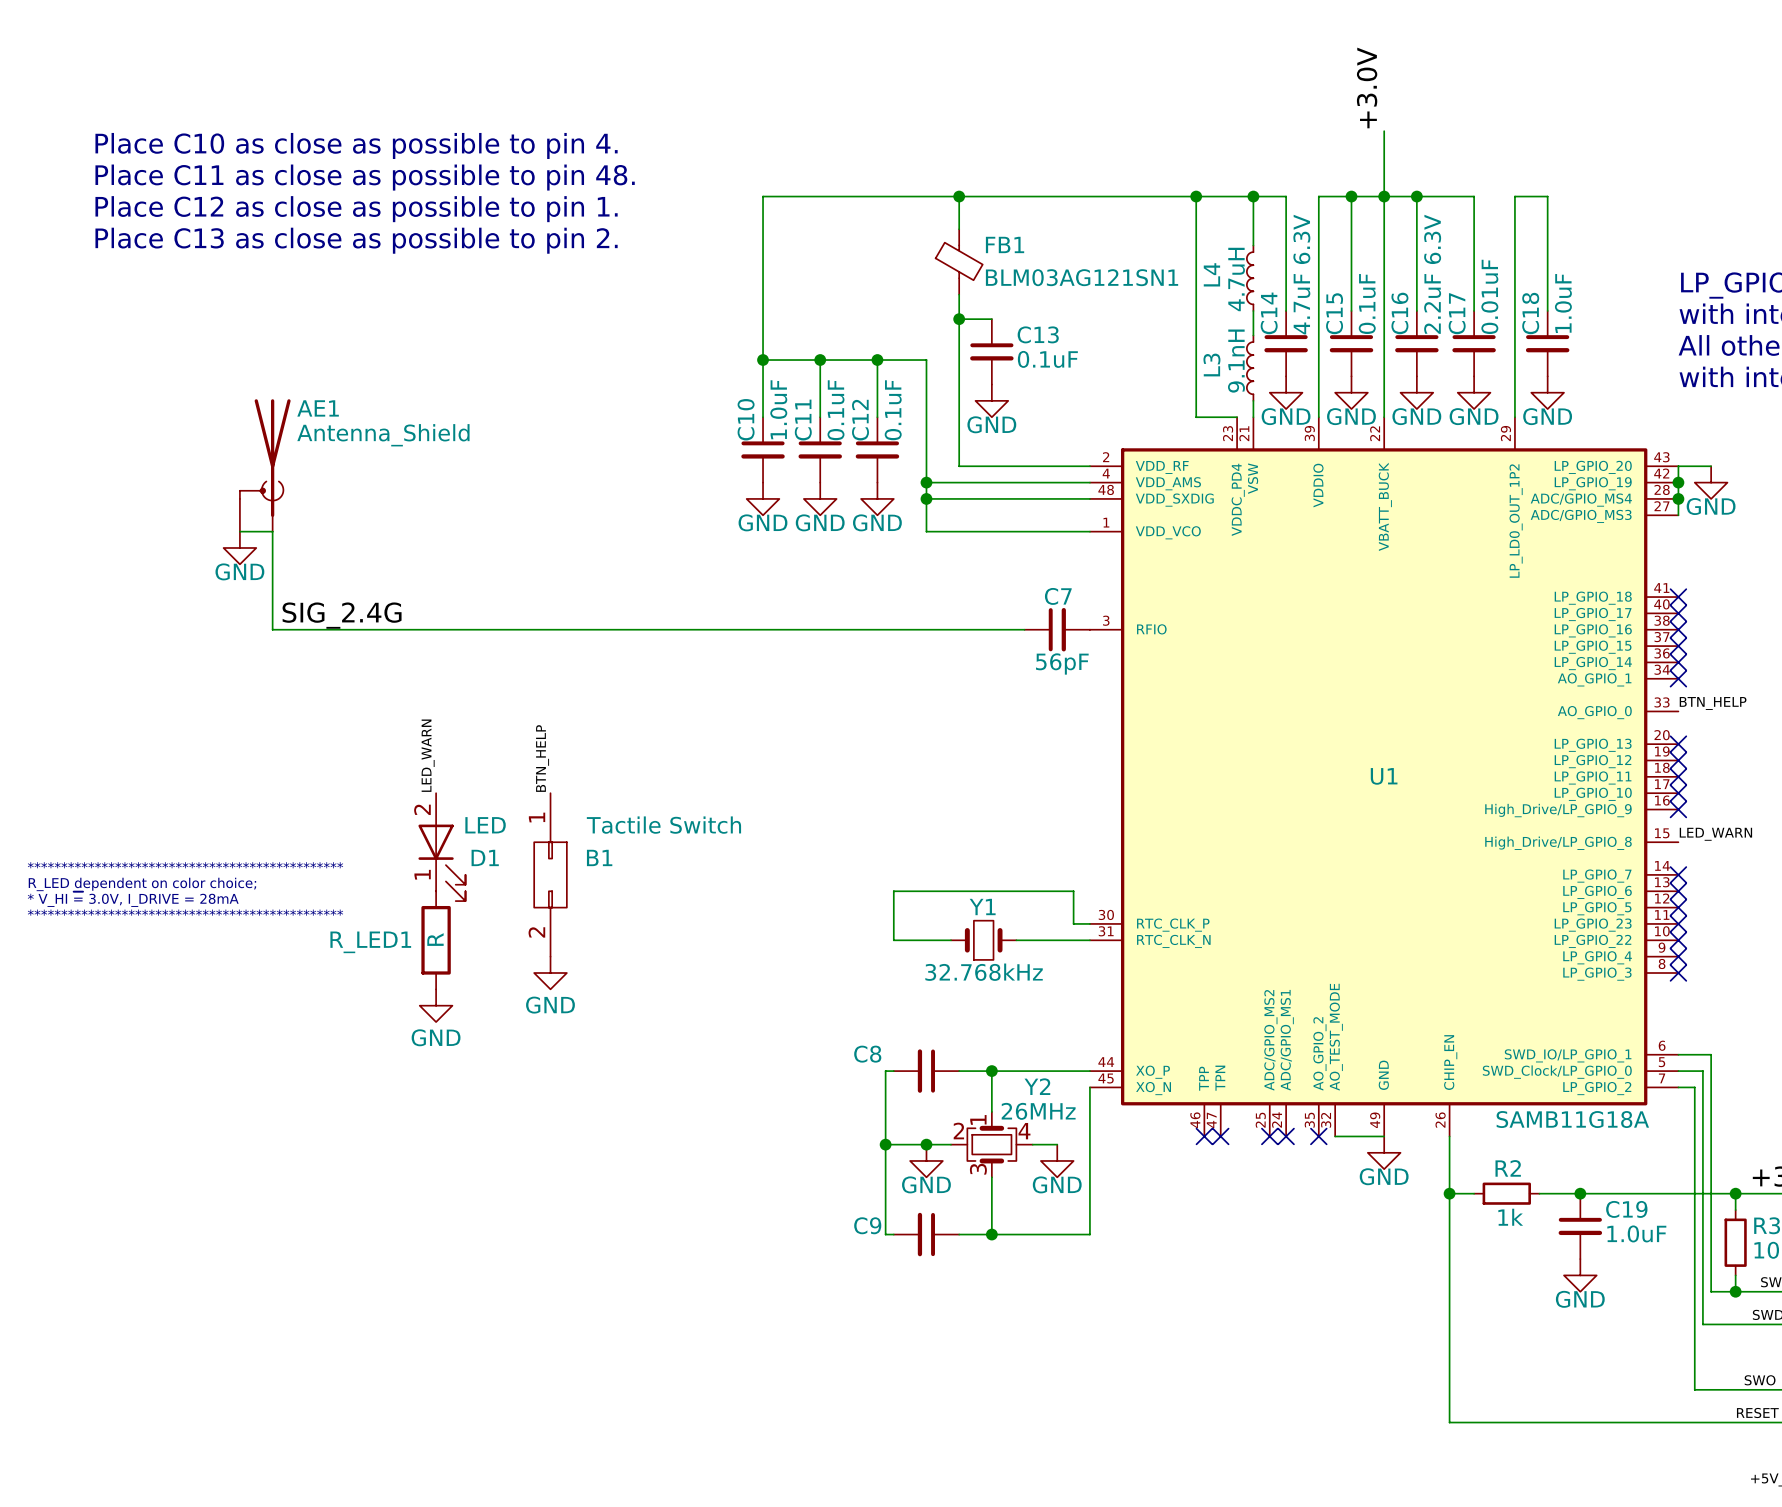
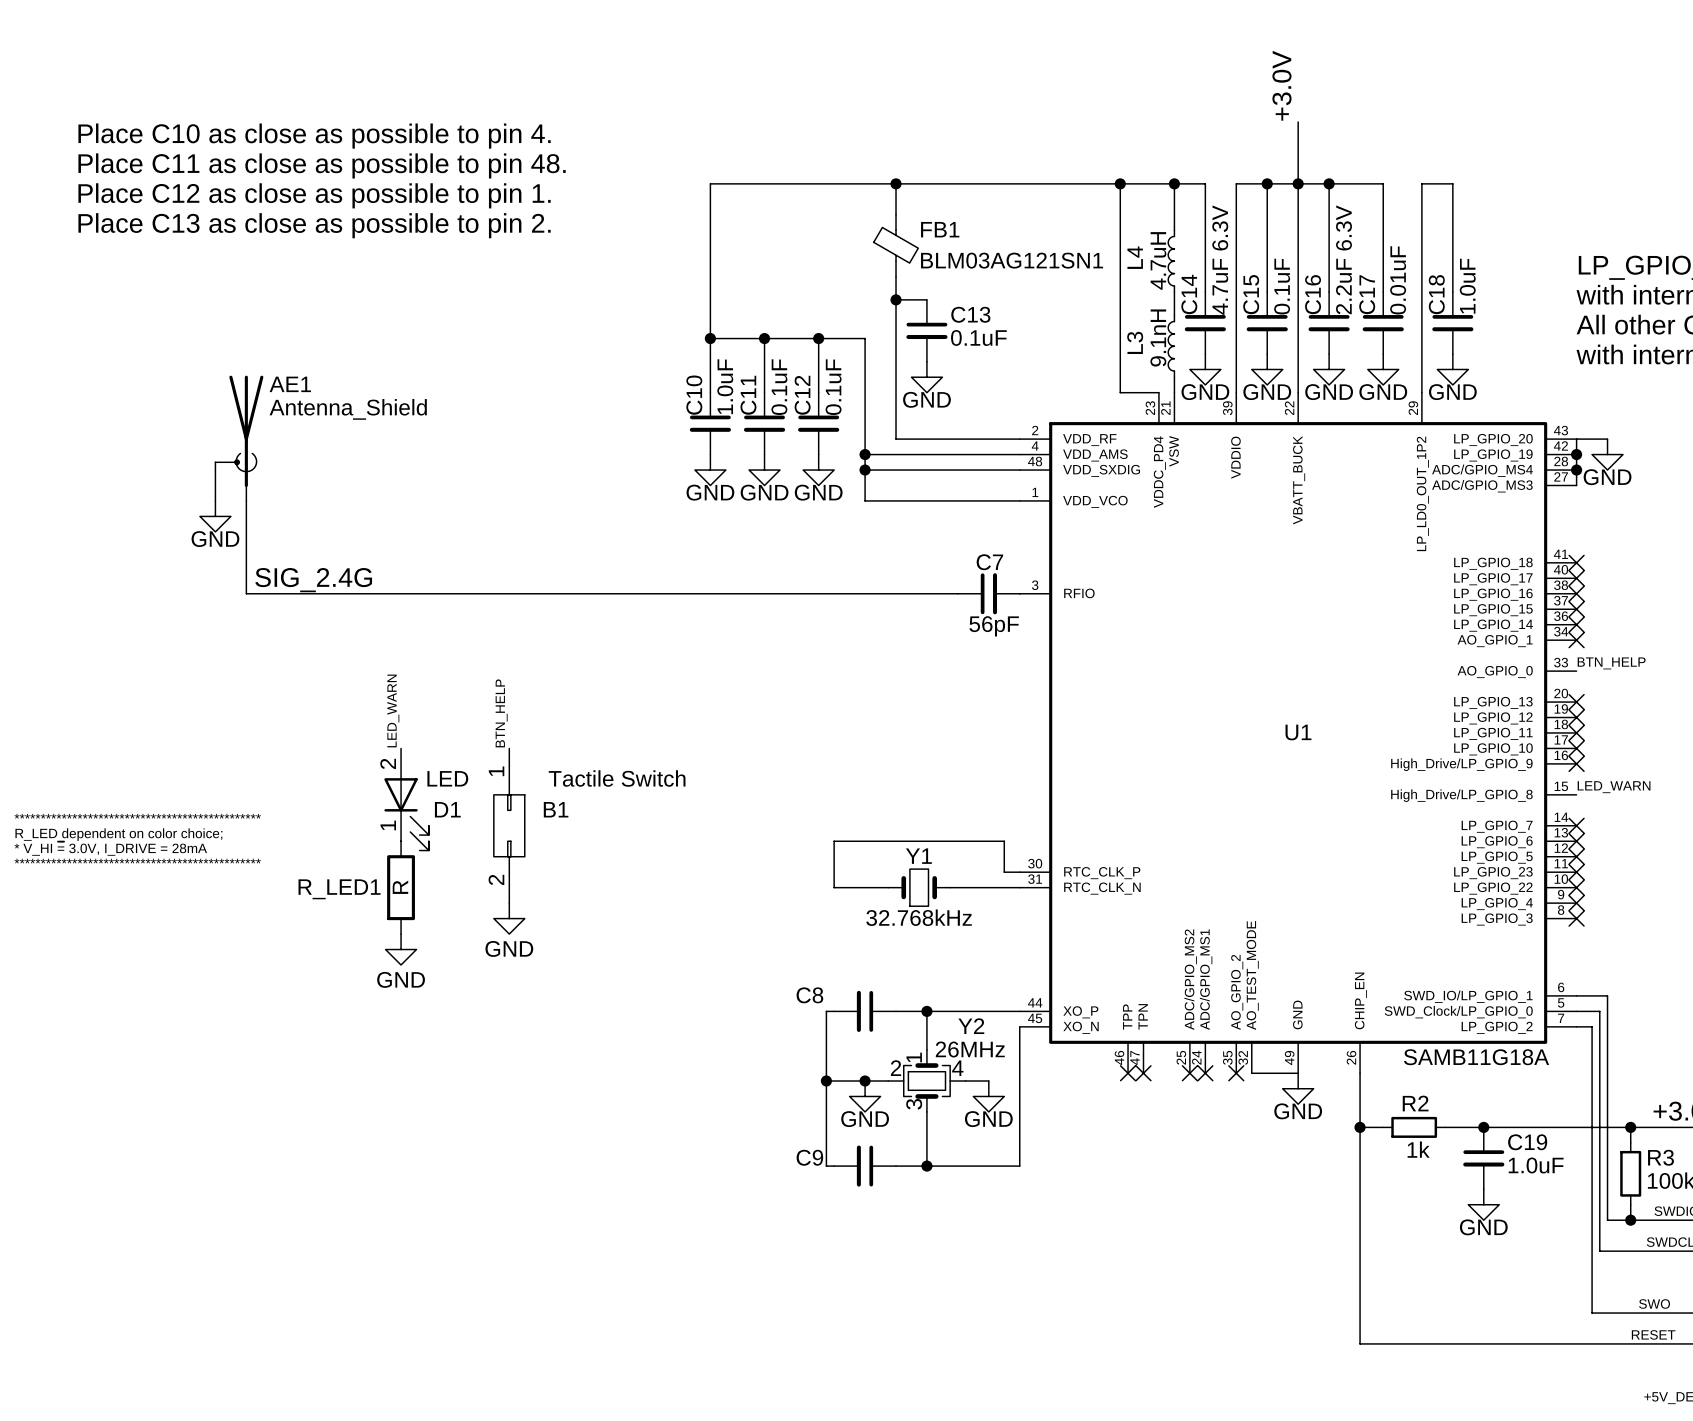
wire: (239, 531) (272, 531) -> none

